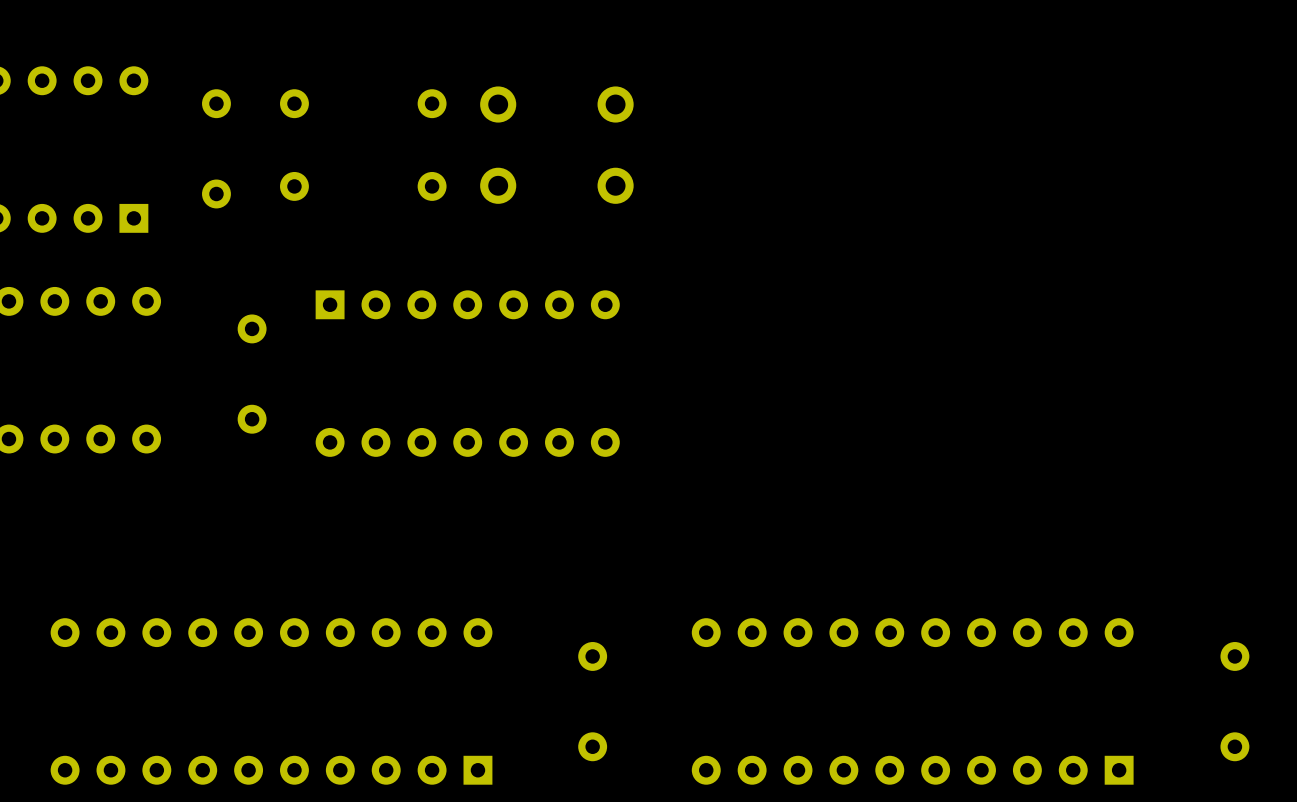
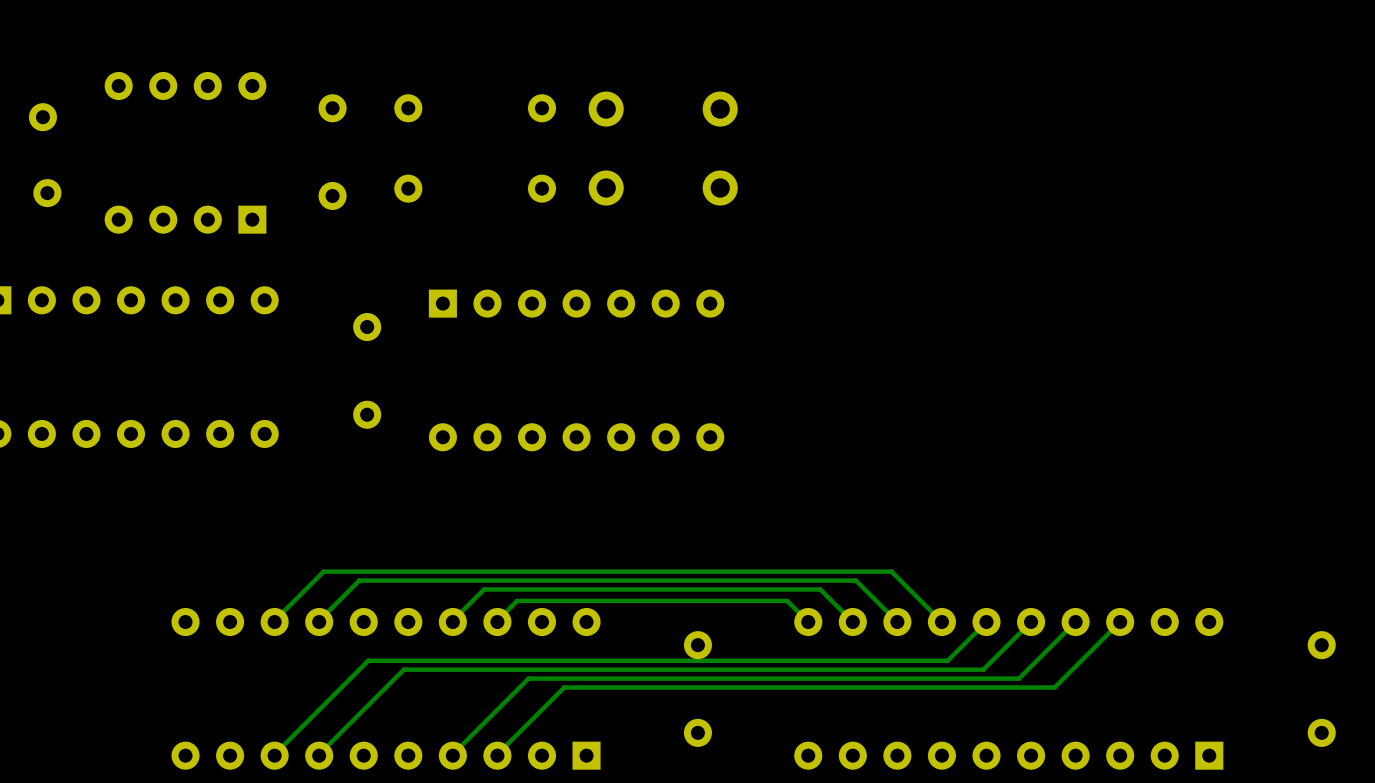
track: none -> (274, 620) (323, 571) (891, 571) (941, 622)
track: none -> (319, 620) (359, 580) (855, 580) (897, 622)
track: none -> (452, 620) (484, 589) (820, 589) (852, 622)
track: none -> (497, 620) (517, 600) (787, 600) (808, 622)
track: none -> (986, 622) (947, 660) (368, 660) (274, 754)
track: none -> (1031, 622) (983, 669) (403, 669) (319, 754)
track: none -> (1075, 622) (1019, 678) (528, 678) (452, 754)
track: none -> (1120, 622) (1054, 687) (564, 687) (497, 754)

